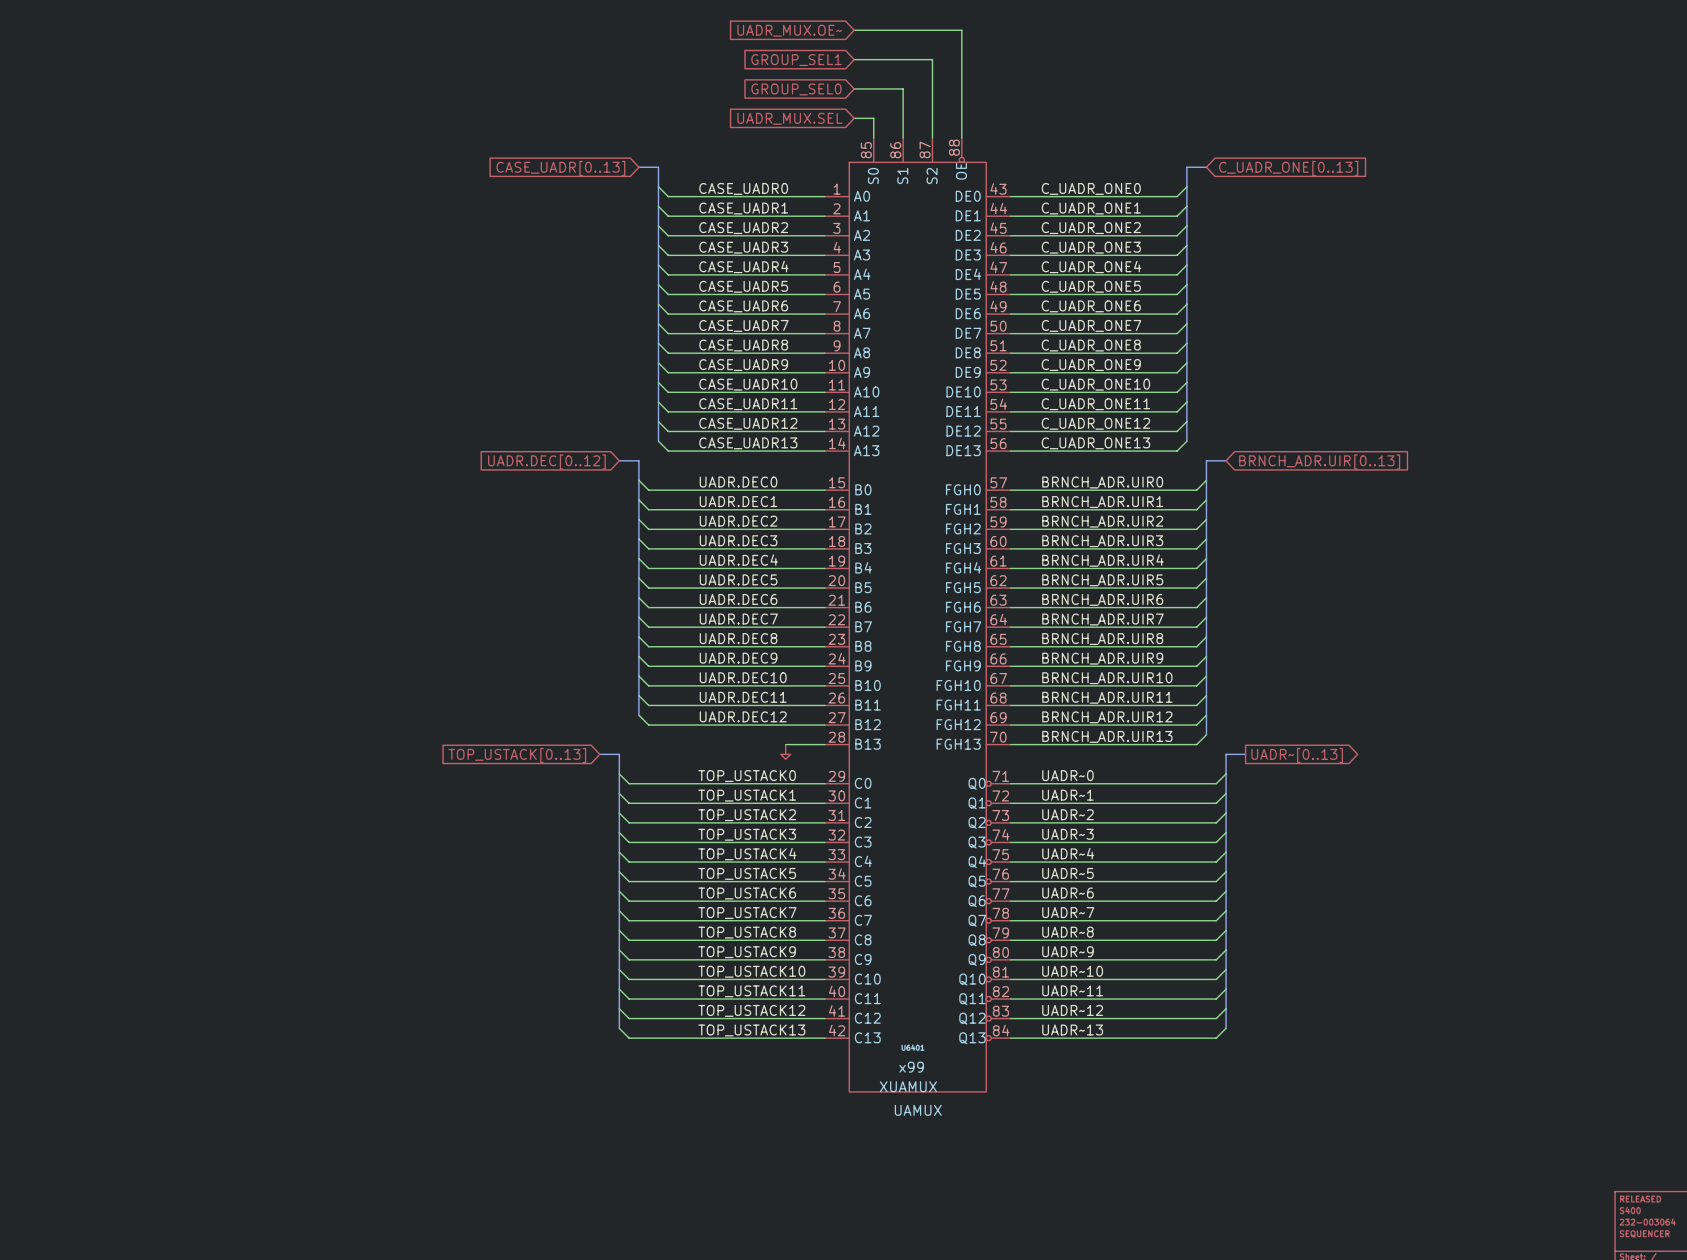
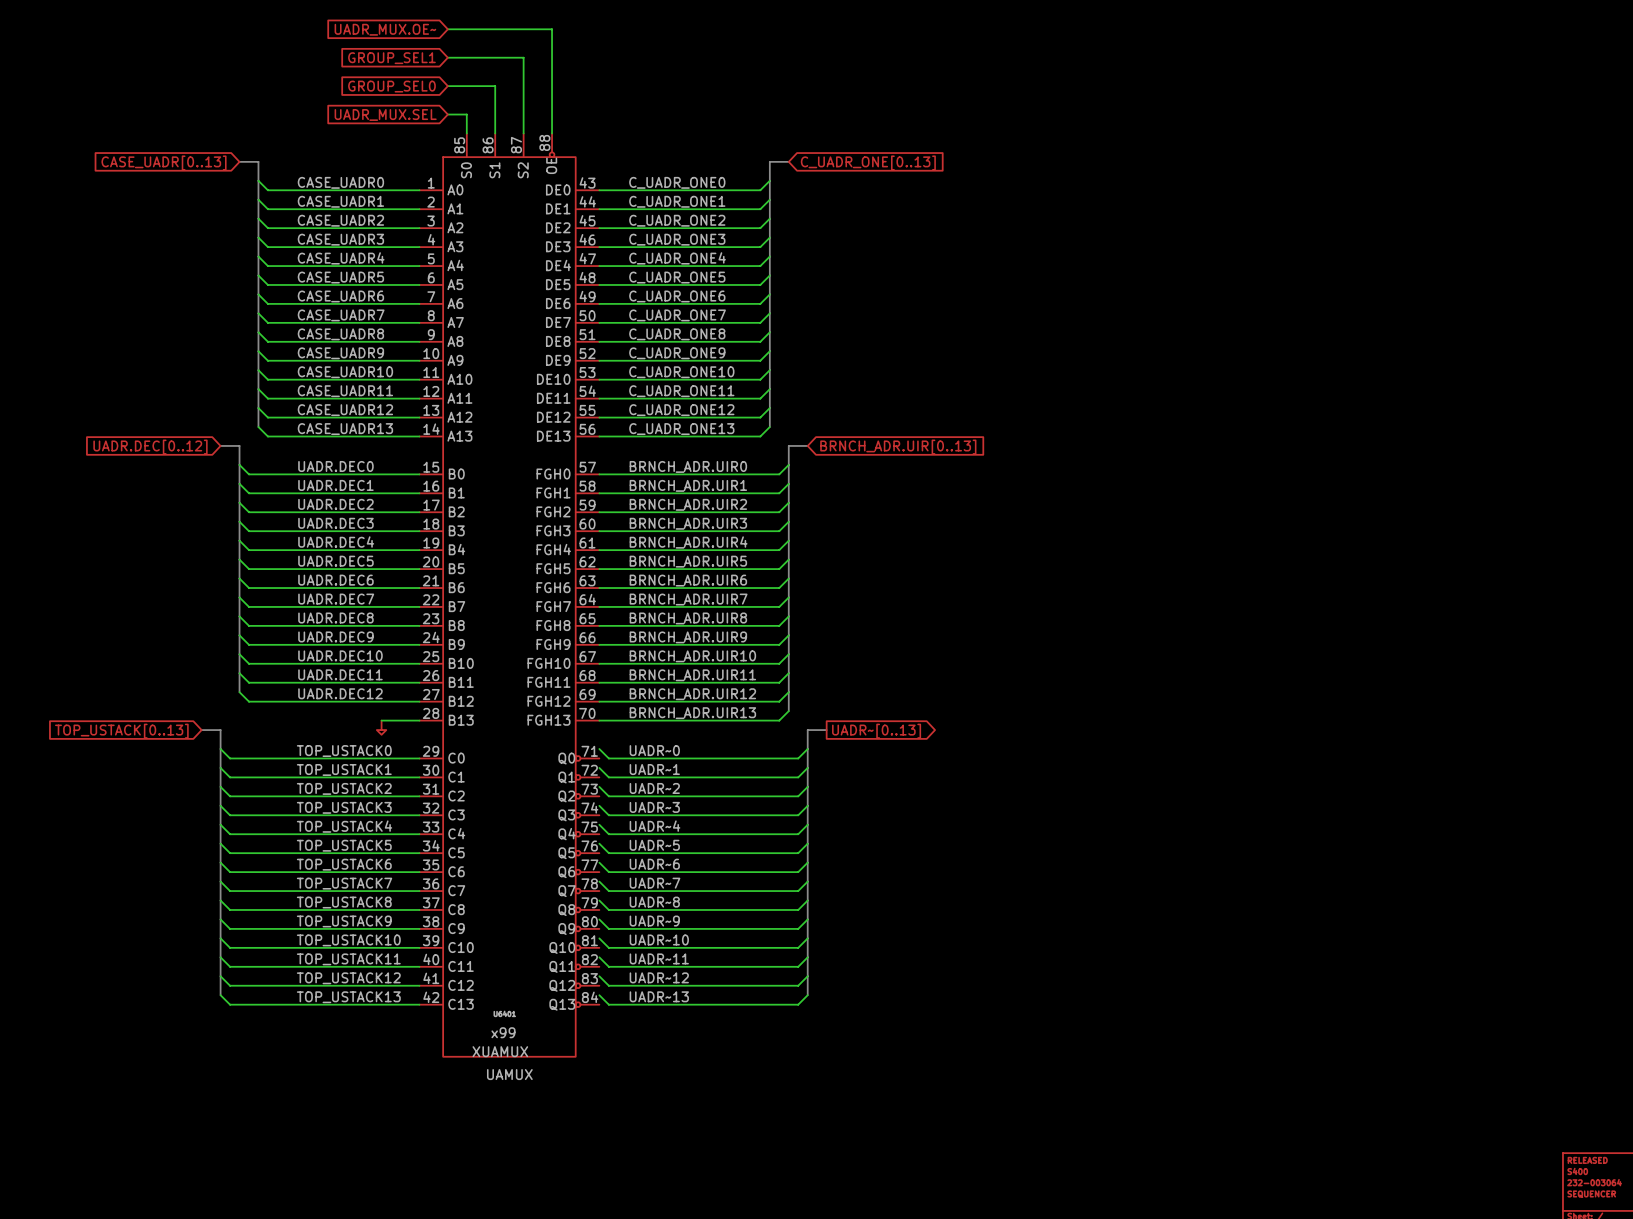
global label: none -> UADR_MUX.OE~ (385, 29)
wire: none -> (447, 29) (552, 29) (552, 133)
global label: UADR_MUX.OE~ (789, 30) -> none
wire: (854, 30) (961, 30) (961, 137) -> none
wire: none -> (447, 57) (523, 57) (523, 133)
wire: (854, 59) (932, 59) (932, 137) -> none
global label: none -> GROUP_SEL1 (391, 58)
global label: GROUP_SEL1 (796, 60) -> none
wire: none -> (447, 86) (495, 86) (495, 133)
wire: (854, 88) (903, 88) (903, 137) -> none
global label: none -> GROUP_SEL0 (391, 86)
global label: GROUP_SEL0 (796, 89) -> none
global label: none -> UADR_MUX.SEL (385, 114)
wire: none -> (447, 114) (466, 114) (466, 133)
global label: UADR_MUX.SEL (789, 118) -> none
wire: (854, 118) (873, 118) (873, 137) -> none
bus: none -> (239, 161) (258, 161) (258, 427)
bus: (638, 167) (658, 167) (658, 441) -> none
bus: none -> (788, 161) (769, 161) (769, 427)
bus: (1206, 167) (1186, 167) (1186, 441) -> none
global label: none -> CASE_UADR[0..13] (164, 163)
global label: CASE_UADR[0..13] (560, 168) -> none
global label: none -> C_UADR_ONE[0..13] (868, 163)
global label: C_UADR_ONE[0..13] (1288, 168) -> none
wire: none -> (258, 180) (267, 190) (419, 190)
wire: (658, 186) (668, 196) -> (599, 190) (646, 190)
wire: (1186, 186) (1177, 196) (1010, 196) -> none
label: none -> CASE_UADR0 (340, 182)
label: CASE_UADR0 (743, 188) -> C_UADR_ONE0 (677, 182)
label: C_UADR_ONE0 (1091, 188) -> none
wire: (785, 196) (824, 196) -> (760, 190) (769, 180)
wire: none -> (258, 199) (267, 209) (419, 209)
wire: (658, 206) (668, 216) -> (599, 209) (646, 209)
wire: (1186, 206) (1177, 216) (1010, 216) -> none
label: none -> CASE_UADR1 (340, 201)
label: CASE_UADR1 (743, 208) -> C_UADR_ONE1 (677, 201)
label: C_UADR_ONE1 (1091, 208) -> none
wire: (785, 216) (824, 216) -> (760, 209) (769, 199)
wire: none -> (258, 218) (267, 228) (419, 228)
wire: (658, 225) (668, 235) -> (599, 228) (646, 228)
wire: (1186, 225) (1177, 235) (1010, 235) -> none
label: none -> CASE_UADR2 (340, 220)
label: CASE_UADR2 (743, 228) -> C_UADR_ONE2 (677, 220)
label: C_UADR_ONE2 (1091, 228) -> none
wire: (785, 235) (824, 235) -> (760, 228) (769, 218)
wire: none -> (258, 237) (267, 247) (419, 247)
wire: (658, 245) (668, 255) -> (599, 247) (646, 247)
wire: (1186, 245) (1177, 255) (1010, 255) -> none
label: none -> CASE_UADR3 (340, 239)
label: CASE_UADR3 (743, 247) -> C_UADR_ONE3 (677, 239)
label: C_UADR_ONE3 (1091, 247) -> none
wire: (785, 255) (824, 255) -> (760, 247) (769, 237)
wire: none -> (258, 256) (267, 266) (419, 266)
wire: (658, 265) (668, 274) -> (599, 266) (646, 266)
wire: (1186, 265) (1177, 274) (1010, 274) -> none
label: none -> CASE_UADR4 (341, 258)
label: CASE_UADR4 (743, 266) -> C_UADR_ONE4 (677, 258)
label: C_UADR_ONE4 (1091, 266) -> none
wire: (785, 274) (824, 274) -> (760, 266) (769, 256)
wire: none -> (258, 275) (267, 284) (419, 284)
wire: (658, 284) (668, 294) -> (599, 284) (646, 284)
wire: (1186, 284) (1177, 294) (1010, 294) -> none
label: none -> CASE_UADR5 (340, 277)
label: CASE_UADR5 (743, 286) -> C_UADR_ONE5 (677, 277)
label: C_UADR_ONE5 (1091, 286) -> none
wire: (785, 294) (824, 294) -> (760, 284) (769, 275)
wire: none -> (258, 294) (267, 303) (419, 303)
wire: (658, 304) (668, 314) -> (599, 303) (646, 303)
wire: (1186, 304) (1177, 314) (1010, 314) -> none
label: none -> CASE_UADR6 (340, 296)
label: CASE_UADR6 (743, 306) -> C_UADR_ONE6 (677, 296)
label: C_UADR_ONE6 (1091, 306) -> none
wire: (785, 314) (824, 314) -> (760, 303) (769, 294)
wire: none -> (258, 313) (267, 322) (419, 322)
wire: (658, 323) (668, 333) -> (599, 322) (646, 322)
wire: (1186, 323) (1177, 333) (1010, 333) -> none
label: none -> CASE_UADR7 (341, 315)
label: CASE_UADR7 (743, 325) -> C_UADR_ONE7 (677, 315)
label: C_UADR_ONE7 (1091, 325) -> none
wire: (785, 333) (824, 333) -> (760, 322) (769, 313)
wire: none -> (258, 332) (267, 341) (419, 341)
wire: (658, 343) (668, 353) -> (599, 341) (646, 341)
wire: (1186, 343) (1177, 353) (1010, 353) -> none
label: none -> CASE_UADR8 (340, 334)
label: CASE_UADR8 (743, 345) -> C_UADR_ONE8 (677, 334)
label: C_UADR_ONE8 (1091, 345) -> none
wire: (785, 353) (824, 353) -> (760, 341) (769, 332)
wire: none -> (258, 351) (267, 360) (419, 360)
wire: (658, 362) (668, 372) -> (599, 360) (646, 360)
wire: (1186, 362) (1177, 372) (1010, 372) -> none
label: none -> CASE_UADR9 (340, 353)
label: CASE_UADR9 (743, 365) -> C_UADR_ONE9 (677, 353)
label: C_UADR_ONE9 (1091, 365) -> none
wire: (785, 372) (824, 372) -> (760, 360) (769, 351)
wire: none -> (258, 370) (267, 379) (419, 379)
wire: (658, 382) (668, 392) -> (599, 379) (646, 379)
wire: (1186, 382) (1177, 392) (1010, 392) -> none
label: none -> CASE_UADR10 (345, 372)
label: none -> C_UADR_ONE10 (681, 372)
label: CASE_UADR10 (748, 384) -> none
label: C_UADR_ONE10 (1095, 384) -> none
wire: (785, 392) (824, 392) -> (760, 379) (769, 370)
wire: none -> (258, 389) (267, 398) (419, 398)
wire: (658, 402) (668, 411) -> (599, 398) (646, 398)
wire: (1186, 402) (1177, 411) (1010, 411) -> none
label: none -> CASE_UADR11 (345, 391)
label: none -> C_UADR_ONE11 (681, 391)
label: CASE_UADR11 (748, 404) -> none
label: C_UADR_ONE11 (1095, 404) -> none
wire: (785, 411) (824, 411) -> (760, 398) (769, 389)
wire: none -> (258, 408) (267, 417) (419, 417)
wire: (658, 421) (668, 431) -> (599, 417) (646, 417)
wire: (1186, 421) (1177, 431) (1010, 431) -> none
label: none -> CASE_UADR12 (345, 410)
label: none -> C_UADR_ONE12 (681, 410)
label: CASE_UADR12 (748, 423) -> none
label: C_UADR_ONE12 (1095, 423) -> none
wire: (785, 431) (824, 431) -> (760, 417) (769, 408)
wire: none -> (258, 427) (267, 436) (419, 436)
wire: (658, 441) (668, 451) -> (599, 436) (646, 436)
wire: (1186, 441) (1177, 451) (1010, 451) -> none
label: none -> CASE_UADR13 (345, 429)
label: none -> C_UADR_ONE13 (681, 429)
label: CASE_UADR13 (748, 443) -> none
label: C_UADR_ONE13 (1095, 443) -> none
wire: (785, 451) (824, 451) -> (760, 436) (769, 427)
bus: none -> (220, 445) (239, 445) (239, 692)
bus: (619, 460) (638, 460) (638, 715) -> none
bus: none -> (807, 445) (788, 445) (788, 711)
bus: (1226, 460) (1206, 460) (1206, 734) -> none
global label: none -> UADR.DEC[0..12] (150, 447)
global label: UADR.DEC[0..12] (546, 461) -> none
global label: none -> BRNCH_ADR.UIR[0..13] (898, 447)
global label: BRNCH_ADR.UIR[0..13] (1319, 461) -> none
wire: none -> (239, 464) (248, 474) (419, 474)
wire: (638, 480) (648, 490) -> (599, 474) (627, 474)
wire: (1206, 480) (1196, 490) (1010, 490) -> none
label: none -> UADR.DEC0 (335, 466)
label: none -> BRNCH_ADR.UIR0 (688, 466)
label: UADR.DEC0 (738, 482) -> none
label: BRNCH_ADR.UIR0 (1102, 482) -> none
wire: (805, 490) (824, 490) -> (779, 474) (788, 464)
wire: none -> (239, 483) (248, 493) (419, 493)
wire: (638, 499) (648, 509) -> (599, 493) (627, 493)
wire: (1206, 499) (1196, 509) (1010, 509) -> none
label: none -> UADR.DEC1 (335, 485)
label: UADR.DEC1 (738, 501) -> none
label: none -> BRNCH_ADR.UIR1 (688, 485)
label: BRNCH_ADR.UIR1 (1102, 502) -> none
wire: (805, 509) (824, 509) -> (779, 493) (788, 483)
wire: none -> (239, 502) (248, 512) (419, 512)
wire: (638, 519) (648, 529) -> (599, 512) (627, 512)
wire: (1206, 519) (1196, 529) (1010, 529) -> none
label: none -> UADR.DEC2 (335, 504)
label: none -> BRNCH_ADR.UIR2 (688, 504)
label: UADR.DEC2 (738, 521) -> none
label: BRNCH_ADR.UIR2 (1102, 521) -> none
wire: (805, 529) (824, 529) -> (779, 512) (788, 502)
wire: none -> (239, 521) (248, 531) (419, 531)
wire: (638, 539) (648, 548) -> (599, 531) (627, 531)
wire: (1206, 539) (1196, 548) (1010, 548) -> none
label: none -> UADR.DEC3 (335, 523)
label: UADR.DEC3 (738, 540) -> none
label: none -> BRNCH_ADR.UIR3 (688, 523)
label: BRNCH_ADR.UIR3 (1102, 541) -> none
wire: (805, 548) (824, 548) -> (779, 531) (788, 521)
wire: none -> (239, 540) (248, 550) (419, 550)
wire: (638, 558) (648, 568) -> (599, 550) (627, 550)
wire: (1206, 558) (1196, 568) (1010, 568) -> none
label: none -> UADR.DEC4 (336, 542)
label: none -> BRNCH_ADR.UIR4 (688, 542)
label: UADR.DEC4 (738, 560) -> none
label: BRNCH_ADR.UIR4 (1102, 560) -> none
wire: (805, 568) (824, 568) -> (779, 550) (788, 540)
wire: none -> (239, 559) (248, 569) (419, 569)
wire: (638, 578) (648, 588) -> (599, 569) (627, 569)
wire: (1206, 578) (1196, 588) (1010, 588) -> none
label: none -> UADR.DEC5 (335, 561)
label: UADR.DEC5 (738, 579) -> none
label: none -> BRNCH_ADR.UIR5 (688, 561)
label: BRNCH_ADR.UIR5 (1102, 580) -> none
wire: (805, 588) (824, 588) -> (779, 569) (788, 559)
wire: none -> (239, 578) (248, 588) (419, 588)
wire: (638, 597) (648, 607) -> (599, 588) (627, 588)
wire: (1206, 597) (1196, 607) (1010, 607) -> none
label: none -> UADR.DEC6 (335, 580)
label: none -> BRNCH_ADR.UIR6 (688, 580)
label: UADR.DEC6 (738, 599) -> none
label: BRNCH_ADR.UIR6 (1102, 599) -> none
wire: (805, 607) (824, 607) -> (779, 588) (788, 578)
part position: (917, 614) -> (509, 595)
wire: none -> (239, 597) (248, 606) (419, 606)
wire: (638, 617) (648, 627) -> (599, 606) (627, 606)
wire: (1206, 617) (1196, 627) (1010, 627) -> none
label: none -> UADR.DEC7 (336, 599)
label: none -> BRNCH_ADR.UIR7 (688, 599)
label: UADR.DEC7 (738, 619) -> none
label: BRNCH_ADR.UIR7 (1102, 619) -> none
wire: (805, 627) (824, 627) -> (779, 606) (788, 597)
wire: none -> (239, 616) (248, 625) (419, 625)
wire: (638, 636) (648, 646) -> (599, 625) (627, 625)
wire: (1206, 636) (1196, 646) (1010, 646) -> none
label: none -> UADR.DEC8 (335, 618)
label: UADR.DEC8 (738, 638) -> none
label: none -> BRNCH_ADR.UIR8 (688, 618)
label: BRNCH_ADR.UIR8 (1102, 639) -> none
wire: (805, 646) (824, 646) -> (779, 625) (788, 616)
wire: none -> (239, 635) (248, 644) (419, 644)
wire: (638, 656) (648, 666) -> (599, 644) (627, 644)
wire: (1206, 656) (1196, 666) (1010, 666) -> none
label: none -> UADR.DEC9 (335, 636)
label: none -> BRNCH_ADR.UIR9 (688, 637)
label: UADR.DEC9 (738, 658) -> none
label: BRNCH_ADR.UIR9 (1102, 658) -> none
wire: (805, 666) (824, 666) -> (779, 644) (788, 635)
wire: none -> (239, 654) (248, 663) (419, 663)
wire: (638, 676) (648, 685) -> (599, 663) (627, 663)
wire: (1206, 676) (1196, 685) (1010, 685) -> none
label: none -> UADR.DEC10 (340, 655)
label: UADR.DEC10 (743, 677) -> none
label: none -> BRNCH_ADR.UIR10 (692, 656)
label: BRNCH_ADR.UIR10 (1107, 678) -> none
wire: (805, 685) (824, 685) -> (779, 663) (788, 654)
wire: none -> (239, 673) (248, 682) (419, 682)
wire: (638, 695) (648, 705) -> (599, 682) (627, 682)
wire: (1206, 695) (1196, 705) (1010, 705) -> none
label: none -> UADR.DEC11 (340, 674)
label: none -> BRNCH_ADR.UIR11 (692, 675)
label: UADR.DEC11 (743, 697) -> none
label: BRNCH_ADR.UIR11 (1107, 697) -> none
wire: (805, 705) (824, 705) -> (779, 682) (788, 673)
wire: none -> (239, 692) (248, 701) (419, 701)
wire: (638, 715) (648, 725) -> (599, 701) (627, 701)
wire: (1206, 715) (1196, 725) (1010, 725) -> none
label: none -> UADR.DEC12 (340, 693)
label: UADR.DEC12 (743, 716) -> none
label: none -> BRNCH_ADR.UIR12 (692, 694)
label: BRNCH_ADR.UIR12 (1107, 717) -> none
wire: (805, 725) (824, 725) -> (779, 701) (788, 692)
wire: (1206, 734) (1196, 744) (1010, 744) -> none
label: none -> BRNCH_ADR.UIR13 (692, 713)
label: BRNCH_ADR.UIR13 (1107, 736) -> none
wire: none -> (381, 720) (419, 720)
wire: none -> (599, 720) (760, 720)
wire: (805, 744) (824, 744) -> (779, 720) (788, 711)
power symbol: none -> (381, 727)
power symbol: (785, 752) -> none
bus: none -> (201, 730) (220, 730) (220, 995)
bus: (599, 754) (619, 754) (619, 1028) -> none
bus: none -> (826, 730) (807, 730) (807, 995)
bus: (1245, 754) (1226, 754) (1226, 1028) -> none
global label: none -> TOP_USTACK[0..13] (121, 731)
global label: TOP_USTACK[0..13] (517, 755) -> none
global label: none -> UADR~[0..13] (876, 731)
global label: UADR~[0..13] (1297, 755) -> none
wire: none -> (220, 749) (230, 758) (419, 758)
wire: none -> (807, 749) (798, 758)
wire: (1226, 773) (1216, 783) (1010, 783) -> none
label: none -> UADR~0 (654, 750)
label: UADR~0 (1067, 775) -> none
label: none -> TOP_USTACK0 (344, 751)
label: TOP_USTACK0 (747, 776) -> none
wire: none -> (220, 767) (230, 777) (419, 777)
wire: none -> (807, 767) (798, 777)
wire: (1226, 793) (1216, 803) (1010, 803) -> none
label: none -> TOP_USTACK1 (344, 769)
label: none -> UADR~1 (654, 769)
label: TOP_USTACK1 (747, 795) -> none
label: UADR~1 (1067, 795) -> none
wire: none -> (220, 786) (230, 796) (419, 796)
wire: none -> (807, 786) (798, 796)
wire: (1226, 813) (1216, 822) (1010, 822) -> none
label: none -> UADR~2 (654, 788)
label: UADR~2 (1067, 814) -> none
label: none -> TOP_USTACK2 (344, 788)
label: TOP_USTACK2 (747, 815) -> none
wire: none -> (220, 805) (230, 815) (419, 815)
wire: none -> (807, 805) (798, 815)
wire: (1226, 832) (1216, 842) (1010, 842) -> none
label: none -> TOP_USTACK3 (344, 807)
label: none -> UADR~3 (654, 807)
label: TOP_USTACK3 (747, 834) -> none
label: UADR~3 (1067, 834) -> none
wire: none -> (220, 824) (230, 834) (419, 834)
wire: none -> (807, 824) (798, 834)
wire: (1226, 852) (1216, 862) (1010, 862) -> none
label: none -> UADR~4 (654, 826)
label: UADR~4 (1068, 853) -> none
label: none -> TOP_USTACK4 (344, 826)
label: TOP_USTACK4 (747, 854) -> none
wire: none -> (220, 843) (230, 853) (419, 853)
wire: none -> (807, 843) (798, 853)
wire: (1226, 871) (1216, 881) (1010, 881) -> none
label: none -> TOP_USTACK5 (344, 845)
label: none -> UADR~5 (654, 845)
label: TOP_USTACK5 (747, 873) -> none
label: UADR~5 (1067, 873) -> none
wire: none -> (220, 862) (230, 872) (419, 872)
wire: none -> (807, 862) (798, 872)
wire: (1226, 891) (1216, 901) (1010, 901) -> none
label: none -> TOP_USTACK6 (344, 864)
label: none -> UADR~6 (654, 864)
label: TOP_USTACK6 (747, 893) -> none
label: UADR~6 (1067, 893) -> none
wire: none -> (220, 881) (230, 891) (419, 891)
wire: none -> (807, 881) (798, 891)
wire: (1226, 910) (1216, 920) (1010, 920) -> none
label: none -> UADR~7 (654, 883)
label: UADR~7 (1068, 912) -> none
label: none -> TOP_USTACK7 (344, 883)
label: TOP_USTACK7 (747, 913) -> none
wire: none -> (220, 900) (230, 909) (419, 909)
wire: none -> (807, 900) (798, 909)
wire: (1226, 930) (1216, 940) (1010, 940) -> none
label: none -> TOP_USTACK8 (344, 902)
label: none -> UADR~8 (654, 902)
label: TOP_USTACK8 (747, 932) -> none
label: UADR~8 (1067, 932) -> none
wire: none -> (220, 919) (230, 928) (419, 928)
wire: none -> (807, 919) (798, 928)
wire: (1226, 950) (1216, 959) (1010, 959) -> none
label: none -> UADR~9 (654, 921)
label: UADR~9 (1067, 951) -> none
label: none -> TOP_USTACK9 (344, 921)
label: TOP_USTACK9 (747, 952) -> none
wire: none -> (220, 938) (230, 947) (419, 947)
wire: none -> (807, 938) (798, 947)
wire: (1226, 969) (1216, 979) (1010, 979) -> none
label: none -> TOP_USTACK10 (348, 940)
label: none -> UADR~10 (659, 939)
label: TOP_USTACK10 (751, 971) -> none
label: UADR~10 (1072, 971) -> none
wire: none -> (220, 957) (230, 966) (419, 966)
wire: none -> (807, 957) (798, 966)
wire: (1226, 989) (1216, 999) (1010, 999) -> none
label: none -> UADR~11 (659, 958)
label: UADR~11 (1072, 990) -> none
label: none -> TOP_USTACK11 (348, 959)
label: TOP_USTACK11 (751, 991) -> none
wire: none -> (220, 976) (230, 985) (419, 985)
wire: none -> (807, 976) (798, 985)
wire: (1226, 1008) (1216, 1018) (1010, 1018) -> none
label: none -> TOP_USTACK12 (348, 978)
label: none -> UADR~12 (659, 977)
label: TOP_USTACK12 (751, 1010) -> none
label: UADR~12 (1072, 1010) -> none
wire: none -> (220, 995) (230, 1004) (419, 1004)
wire: none -> (807, 995) (798, 1004)
wire: (1226, 1028) (1216, 1038) (1010, 1038) -> none
label: none -> TOP_USTACK13 (348, 997)
label: none -> UADR~13 (659, 996)
label: TOP_USTACK13 (751, 1030) -> none
label: UADR~13 (1072, 1030) -> none

